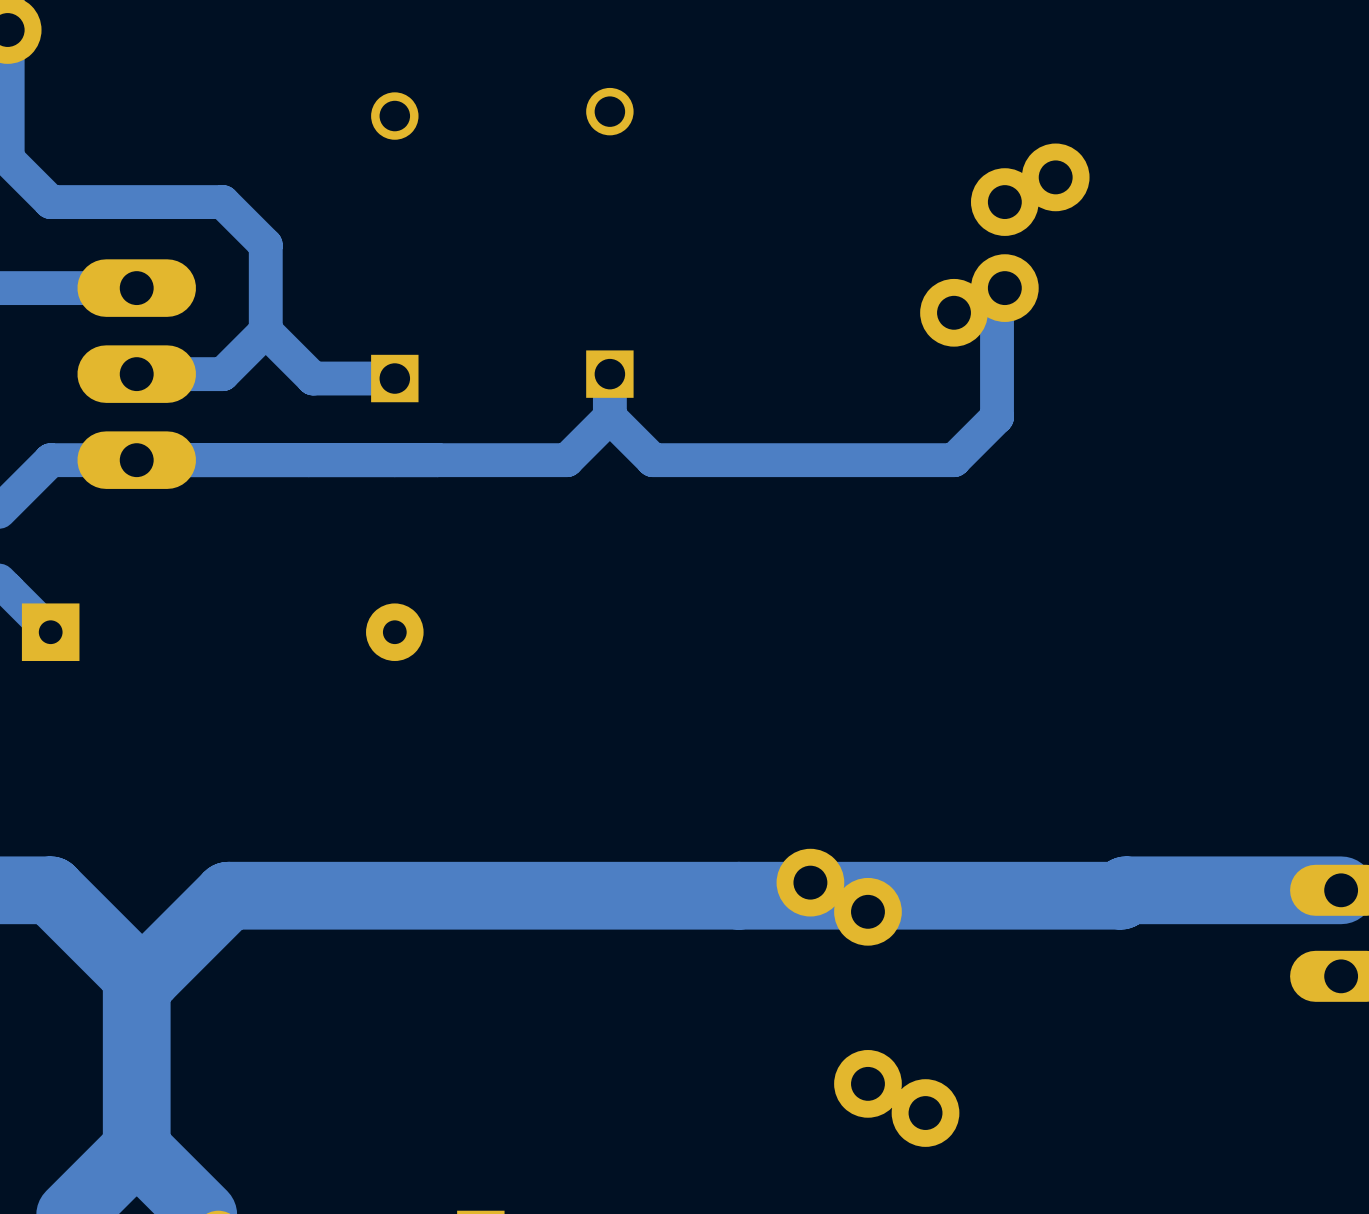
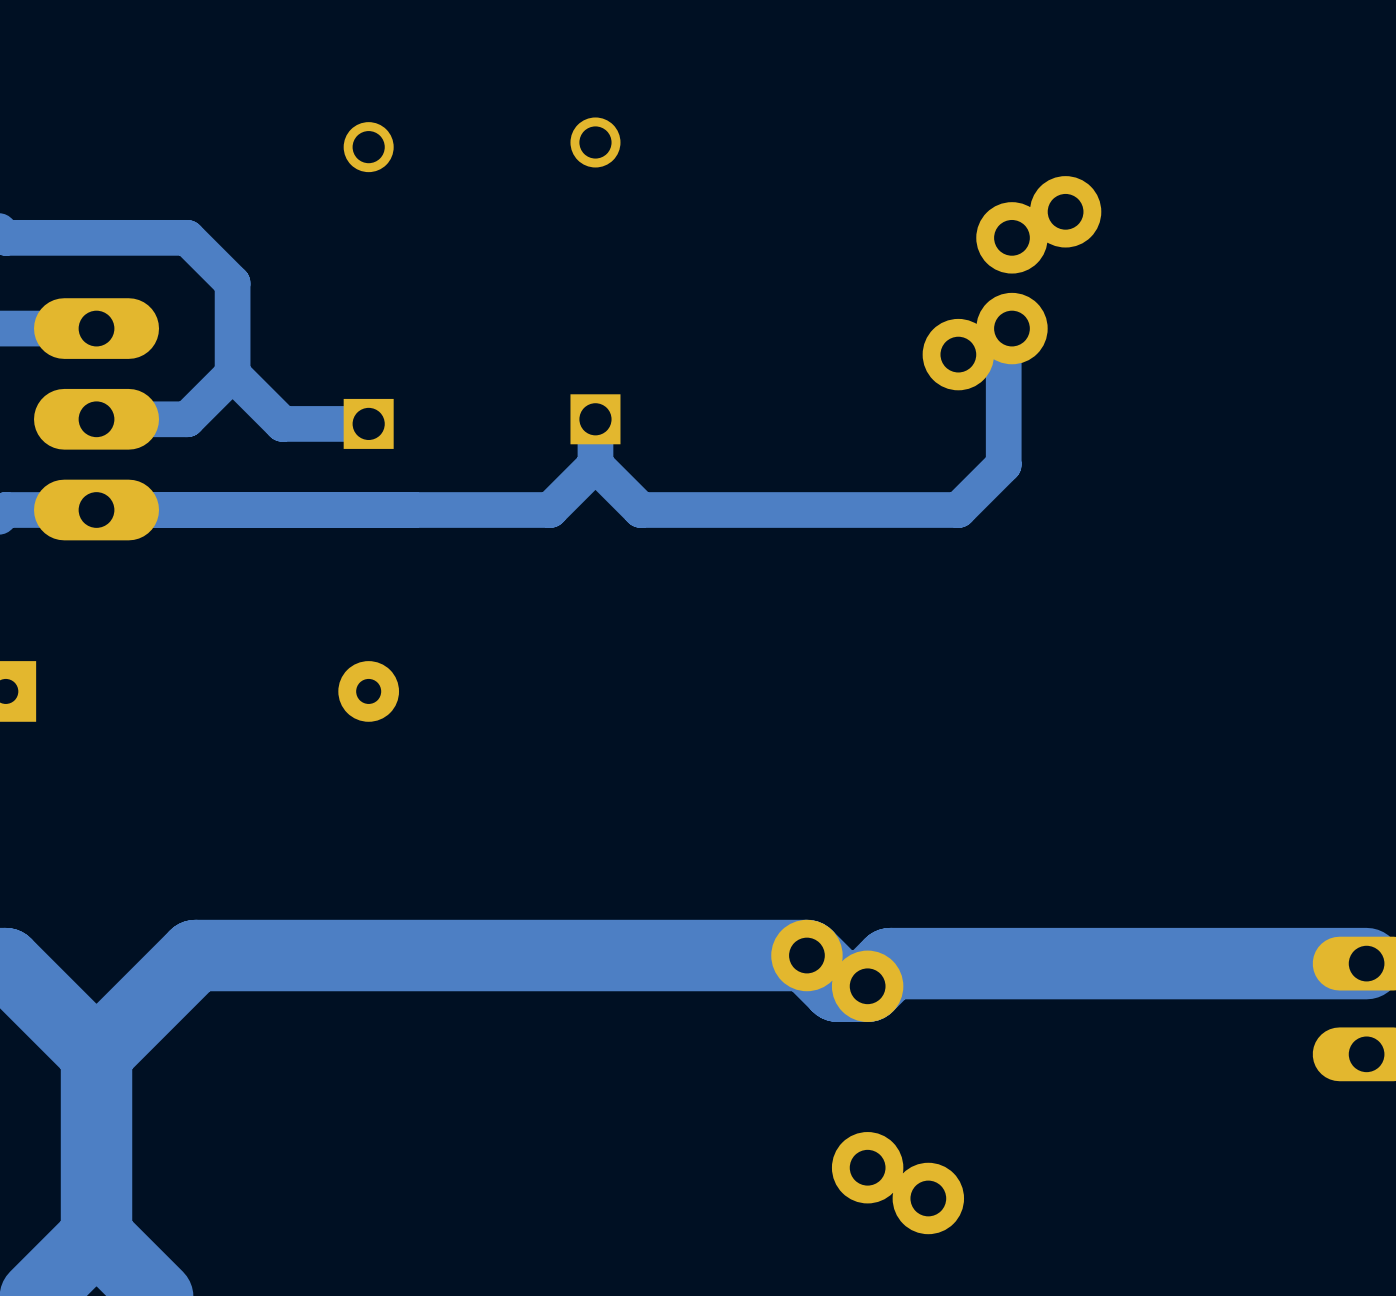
track: (1126, 890) (1120, 895) (228, 895) (147, 976) (136, 976) -> (1139, 963) (890, 963) (867, 986) (837, 986) (806, 955) (195, 955) (96, 1054)

